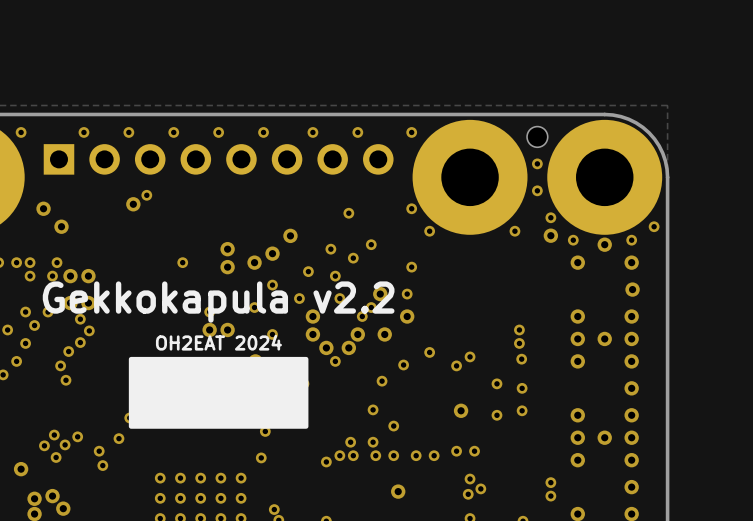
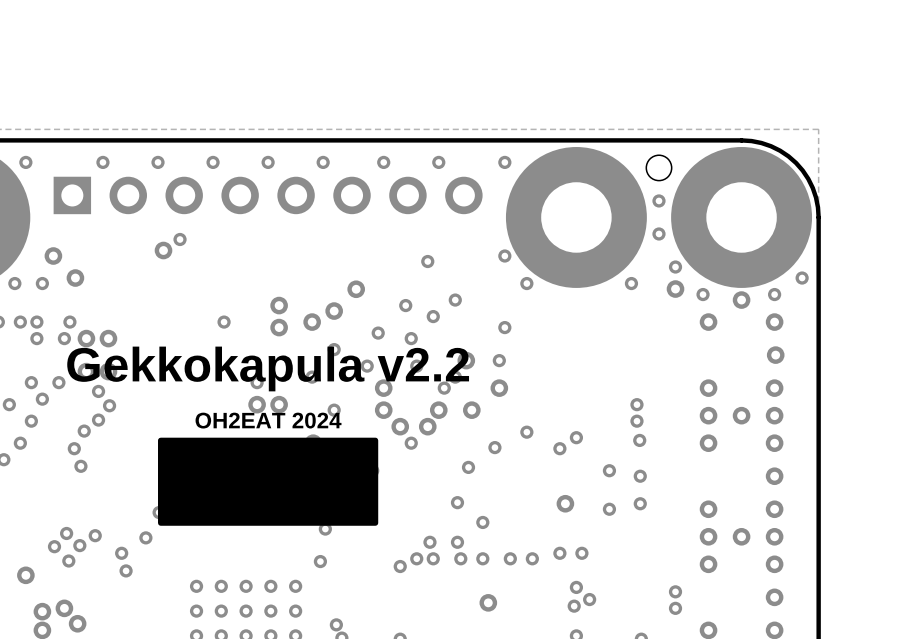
via: none -> (14, 283)
via: none -> (42, 283)

